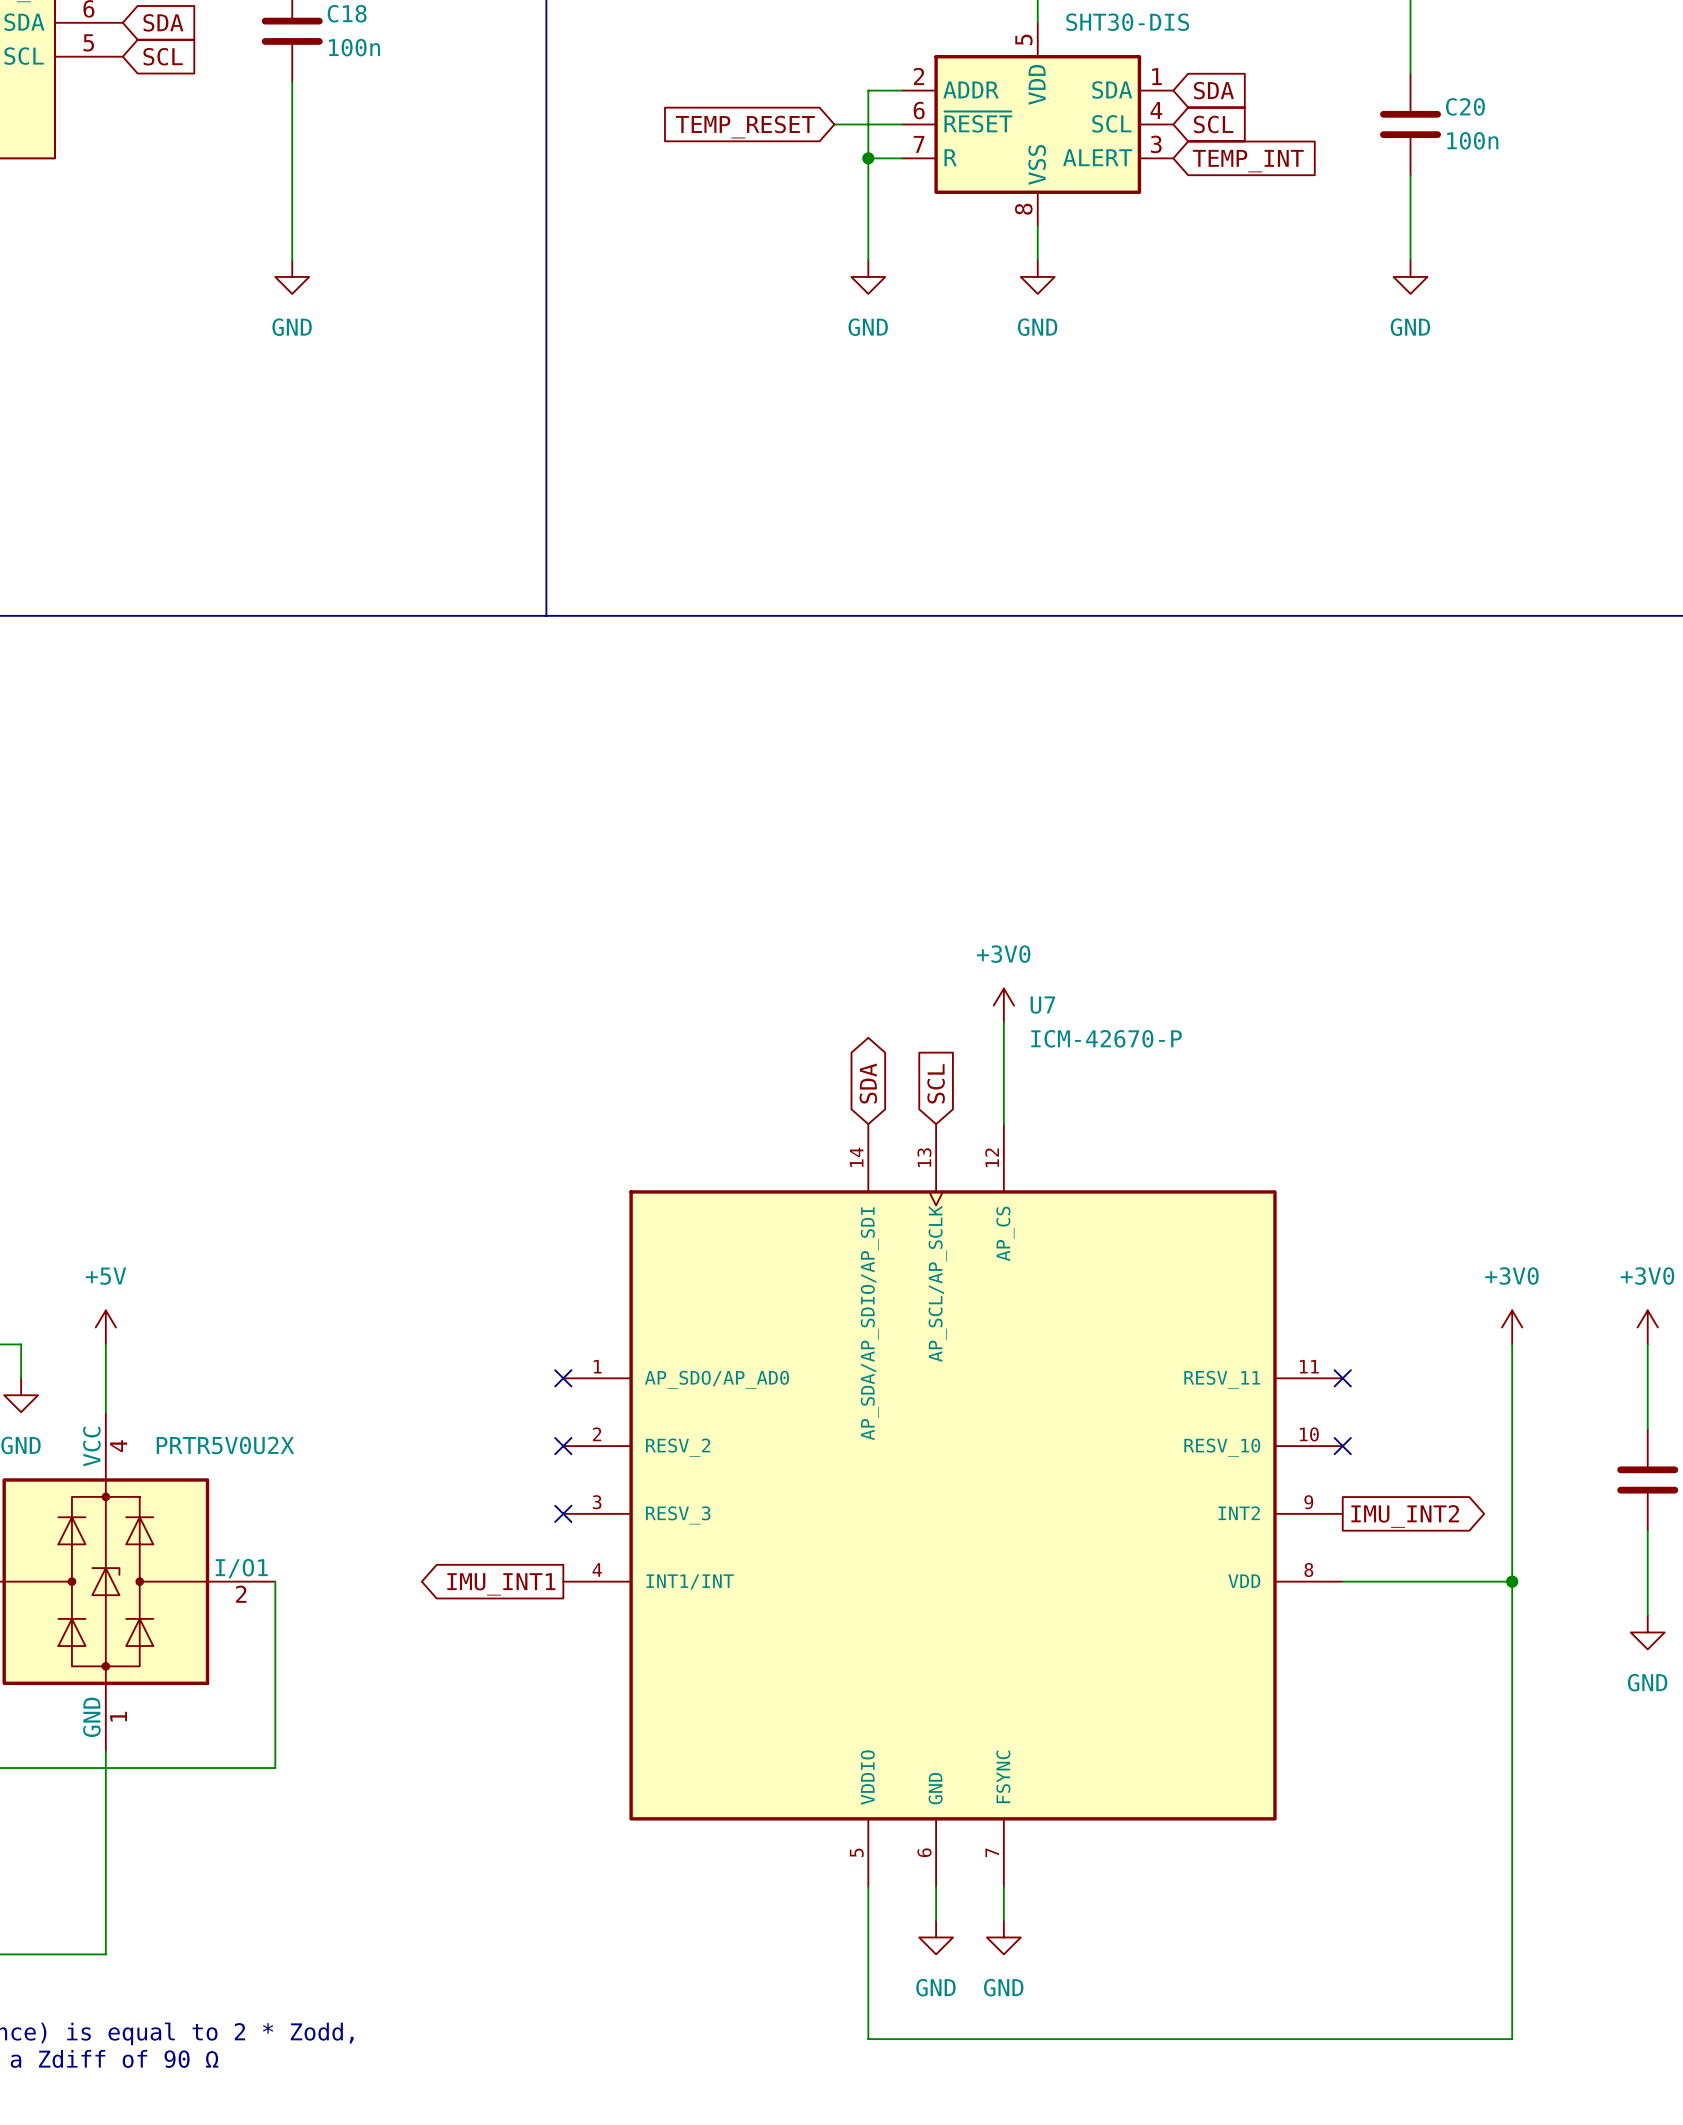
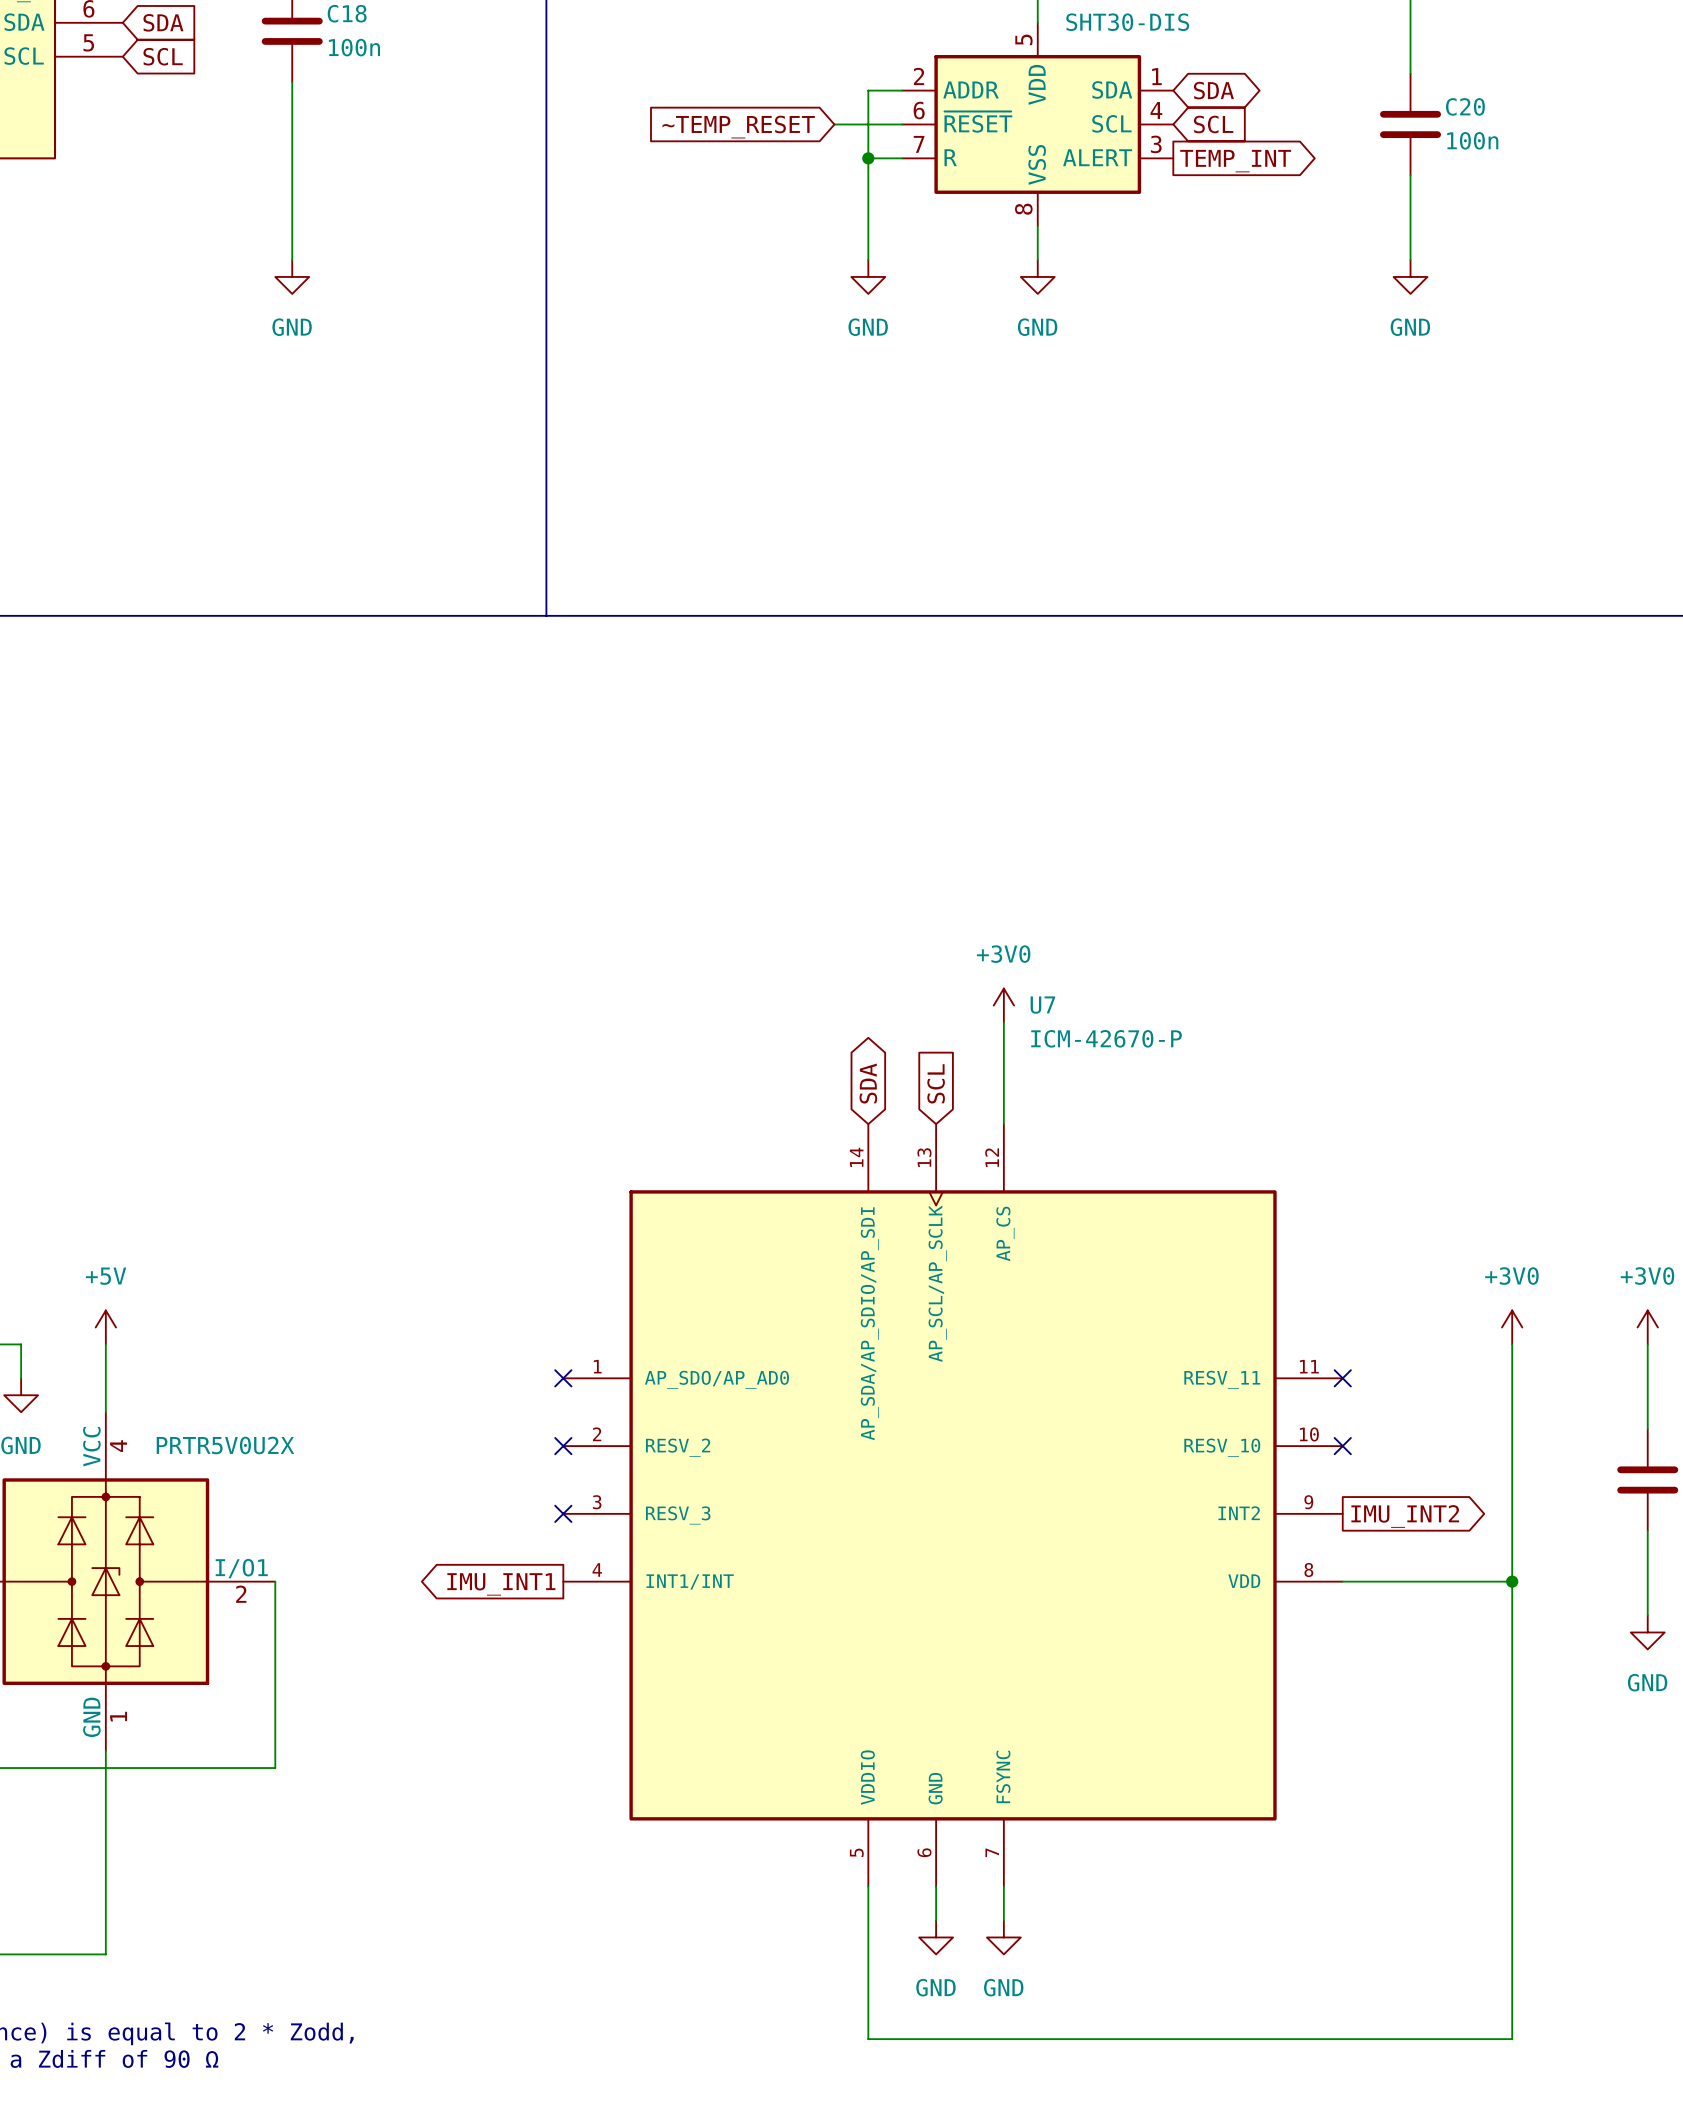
global label shape: input (1213, 90) -> bidirectional (1213, 90)
global label: TEMP_RESET (745, 127) -> ~TEMP_RESET (738, 127)
global label shape: input (1248, 161) -> output (1235, 161)

